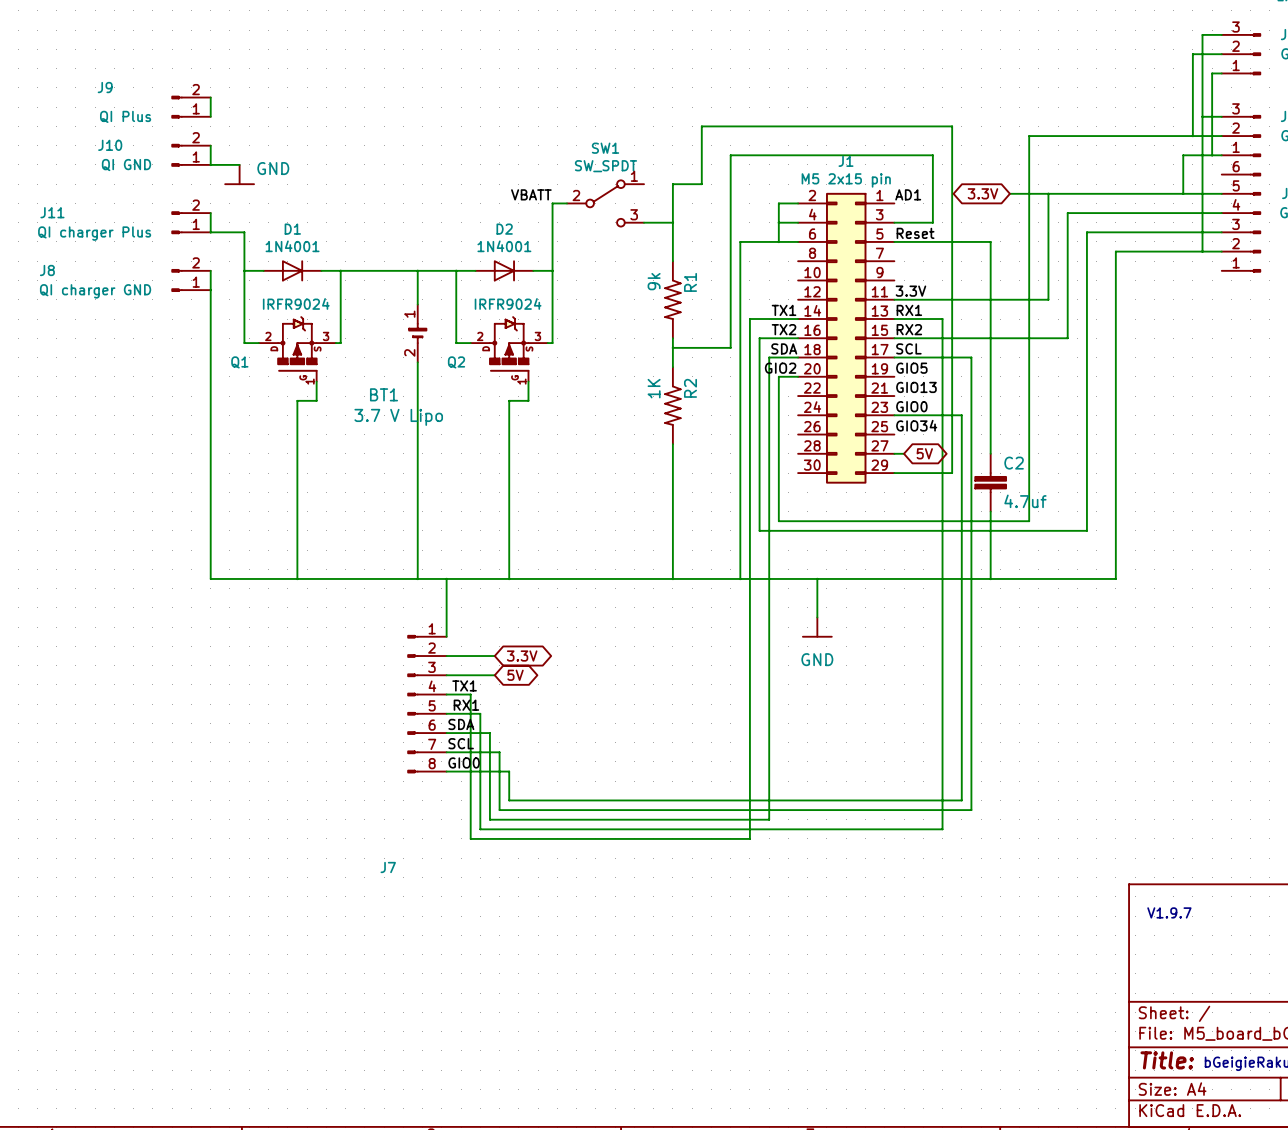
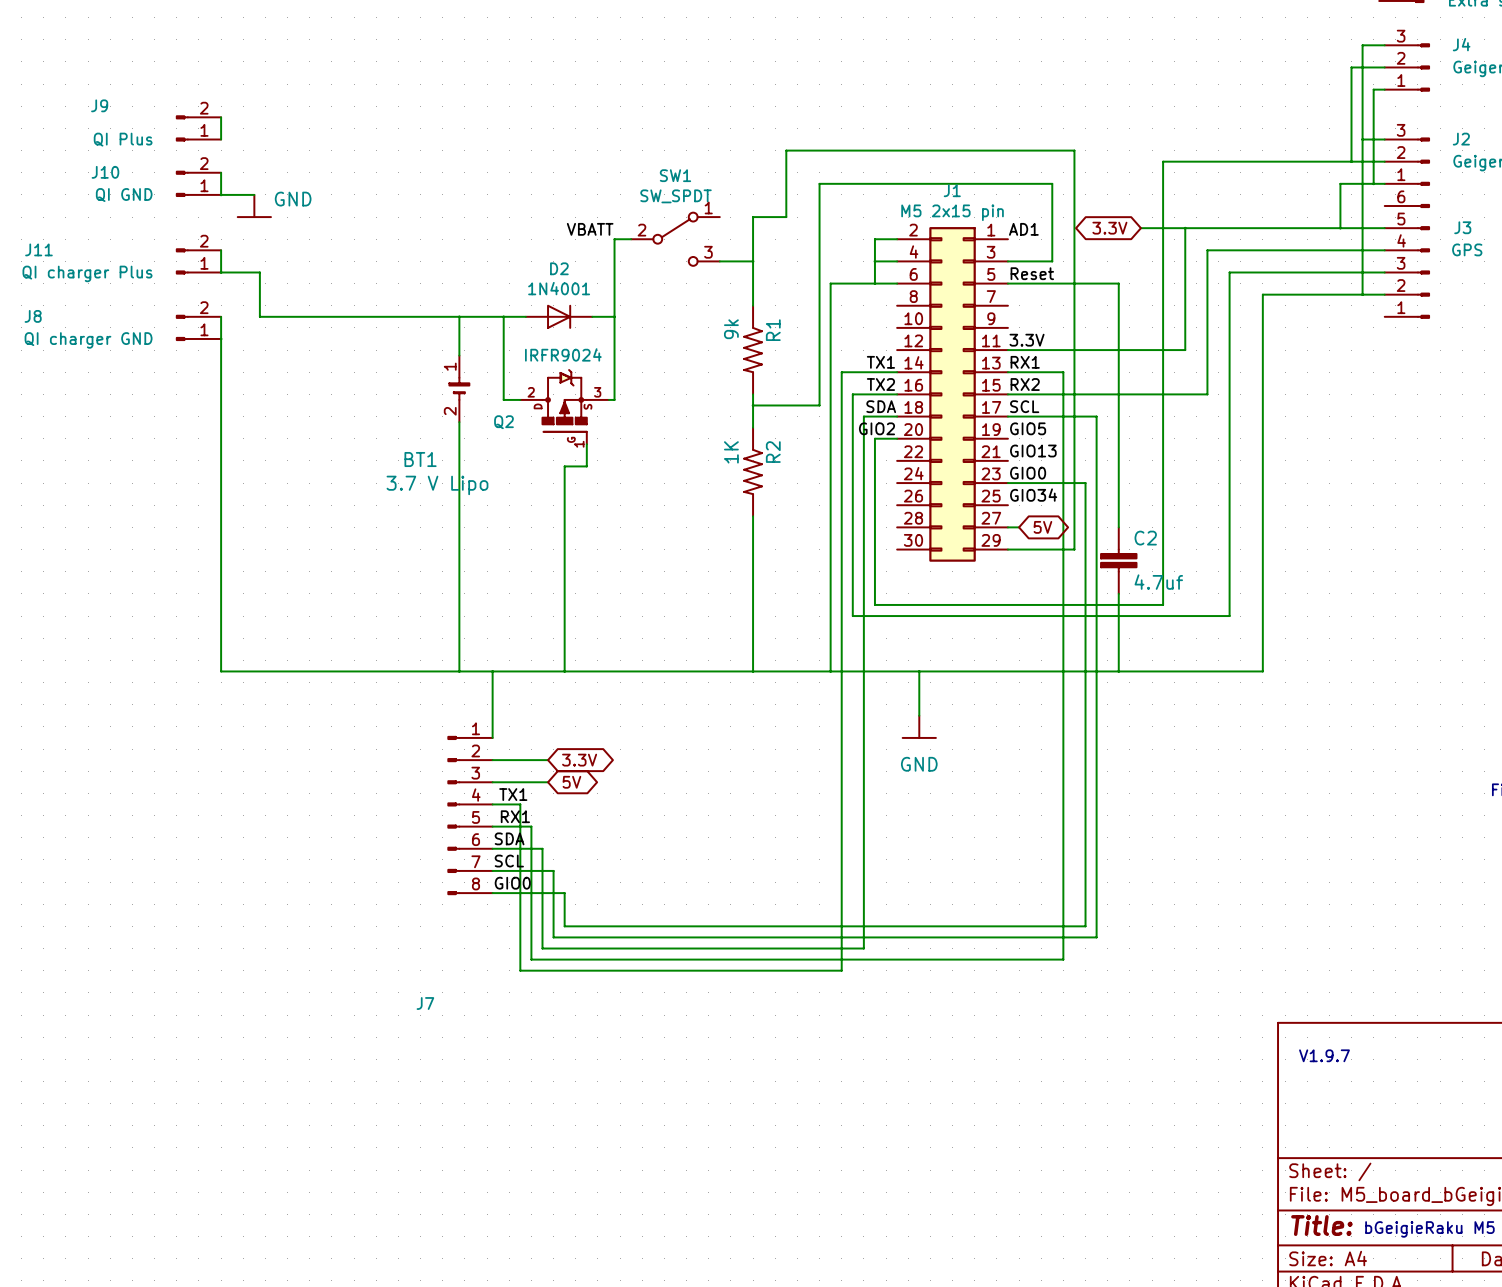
wire: (244, 270) (244, 343) (258, 343) -> none
D1: 1N4001 (292, 270) -> none
wire: (340, 270) (340, 343) (335, 343) -> none
Q1: IRFR9024 (297, 349) -> none
wire: (316, 381) (316, 400) (297, 400) (297, 578) -> none

